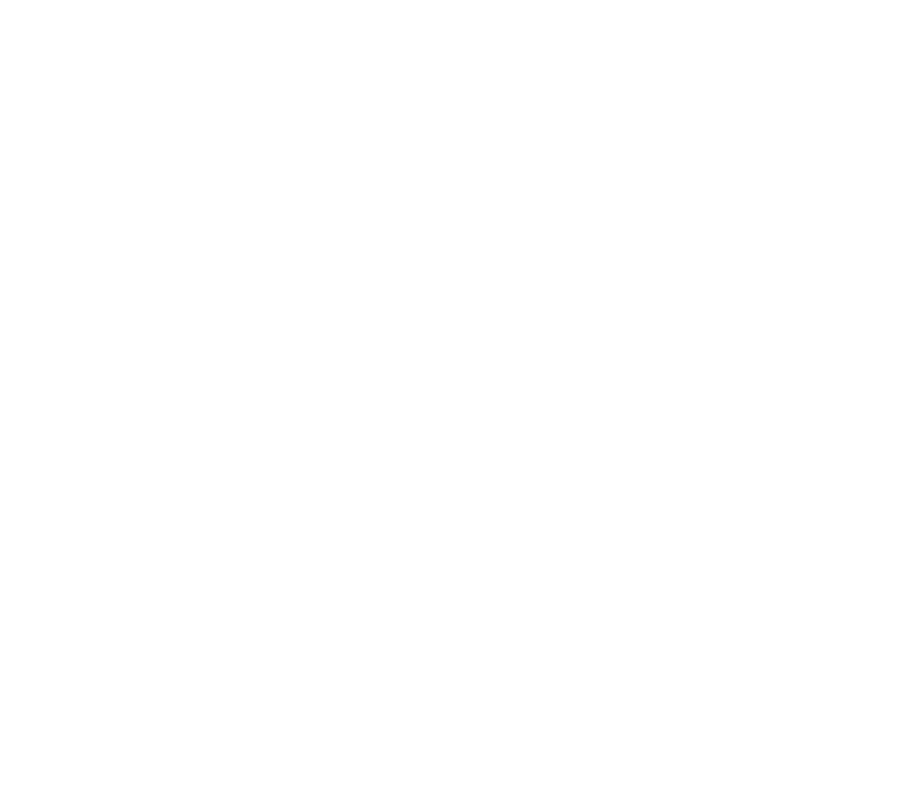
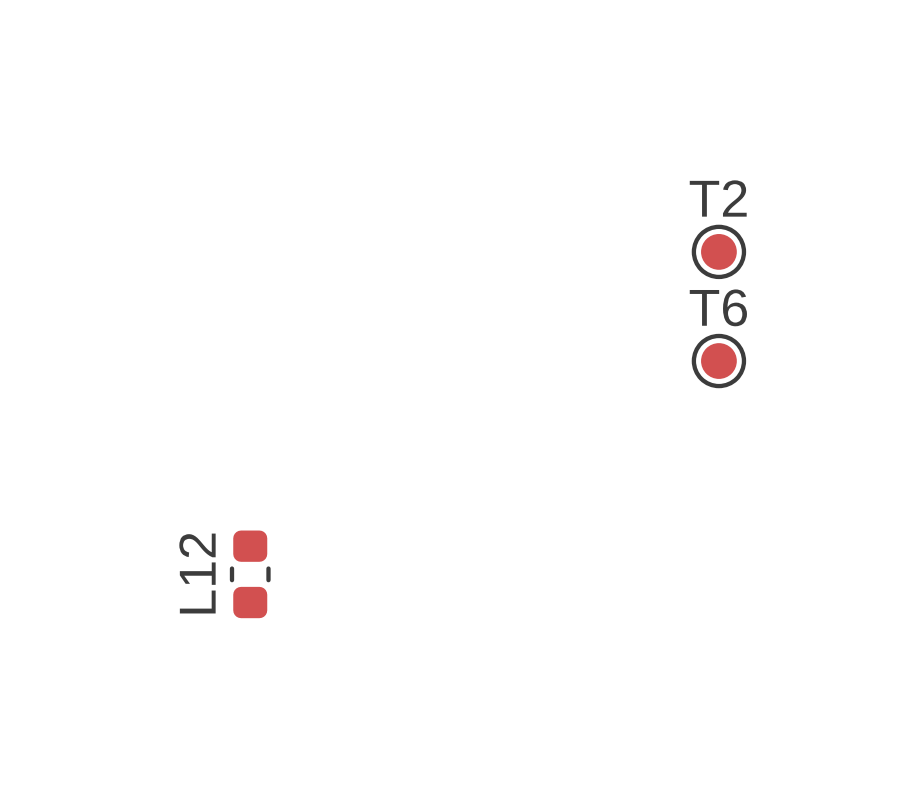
T2: none -> (718, 251)
T6: none -> (718, 361)
L12: none -> (250, 574)

